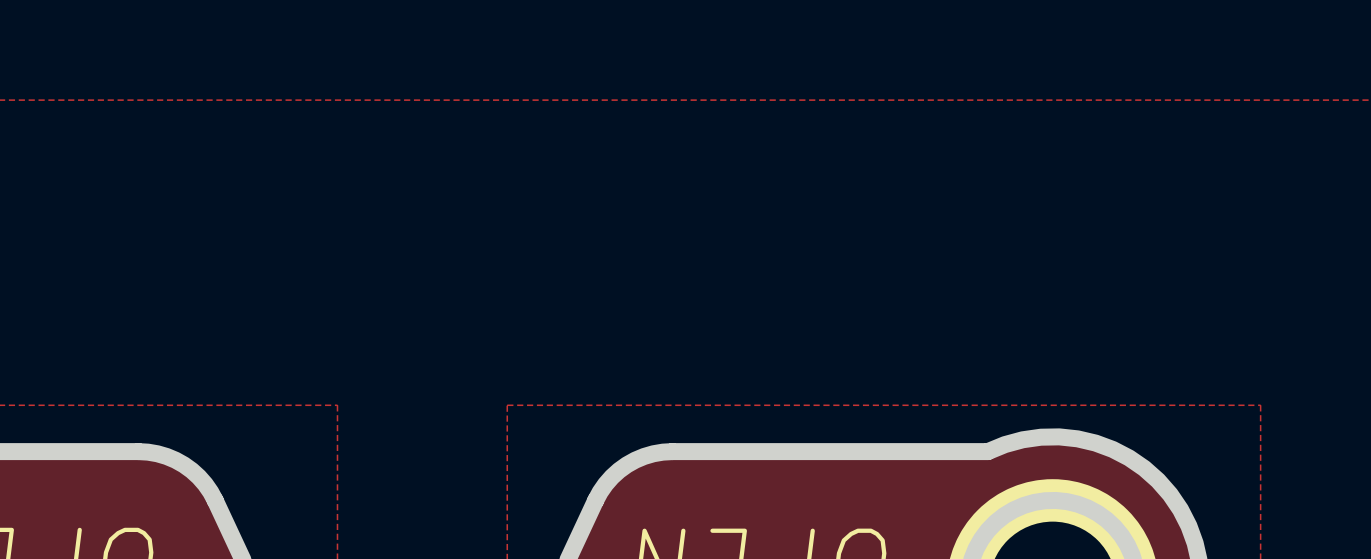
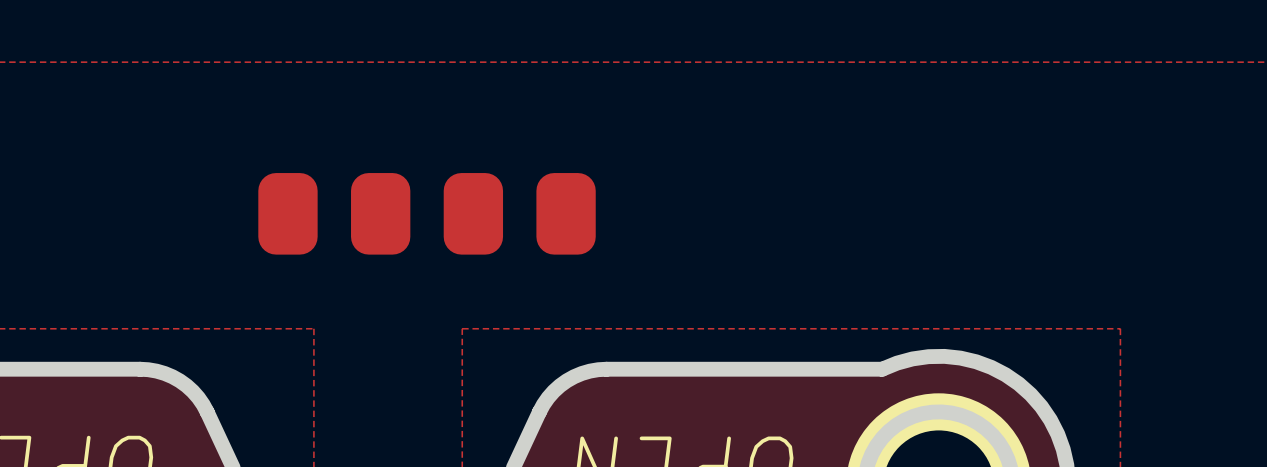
part: none -> (287, 213)
part: none -> (380, 213)
part: none -> (473, 213)
part: none -> (566, 213)

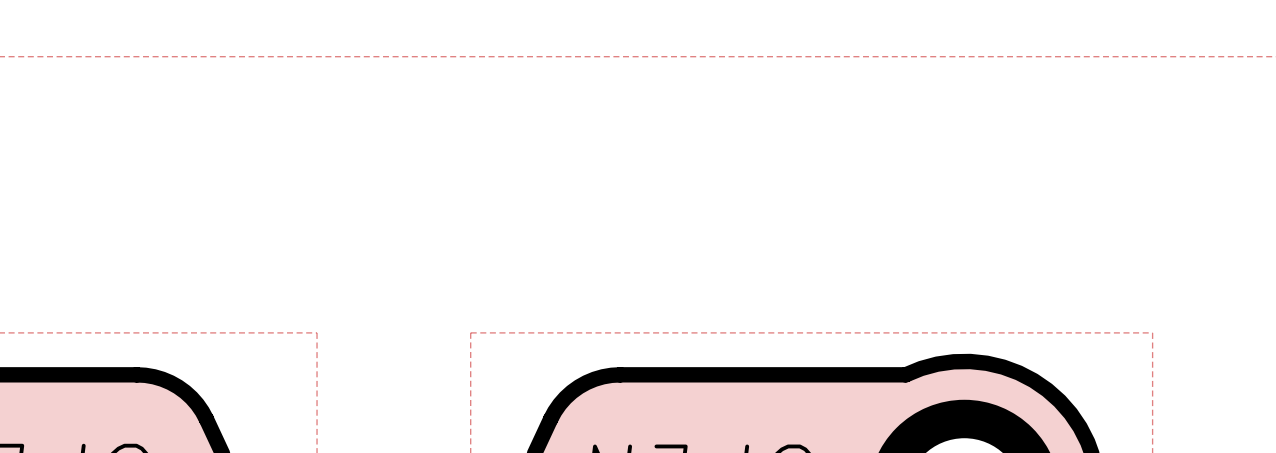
part: (287, 213) -> none
part: (380, 213) -> none
part: (473, 213) -> none
part: (566, 213) -> none

